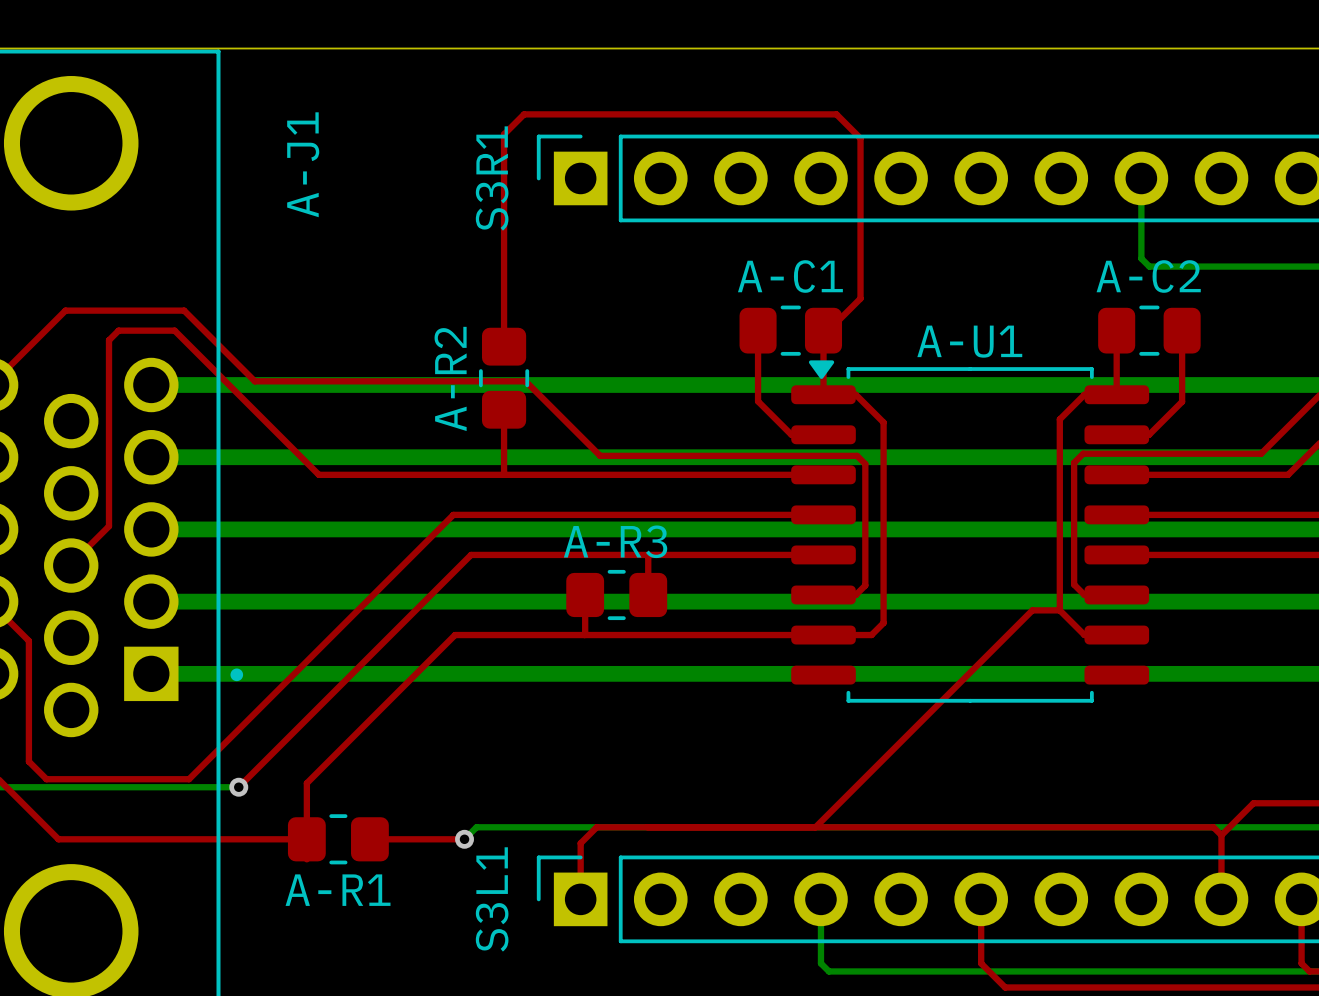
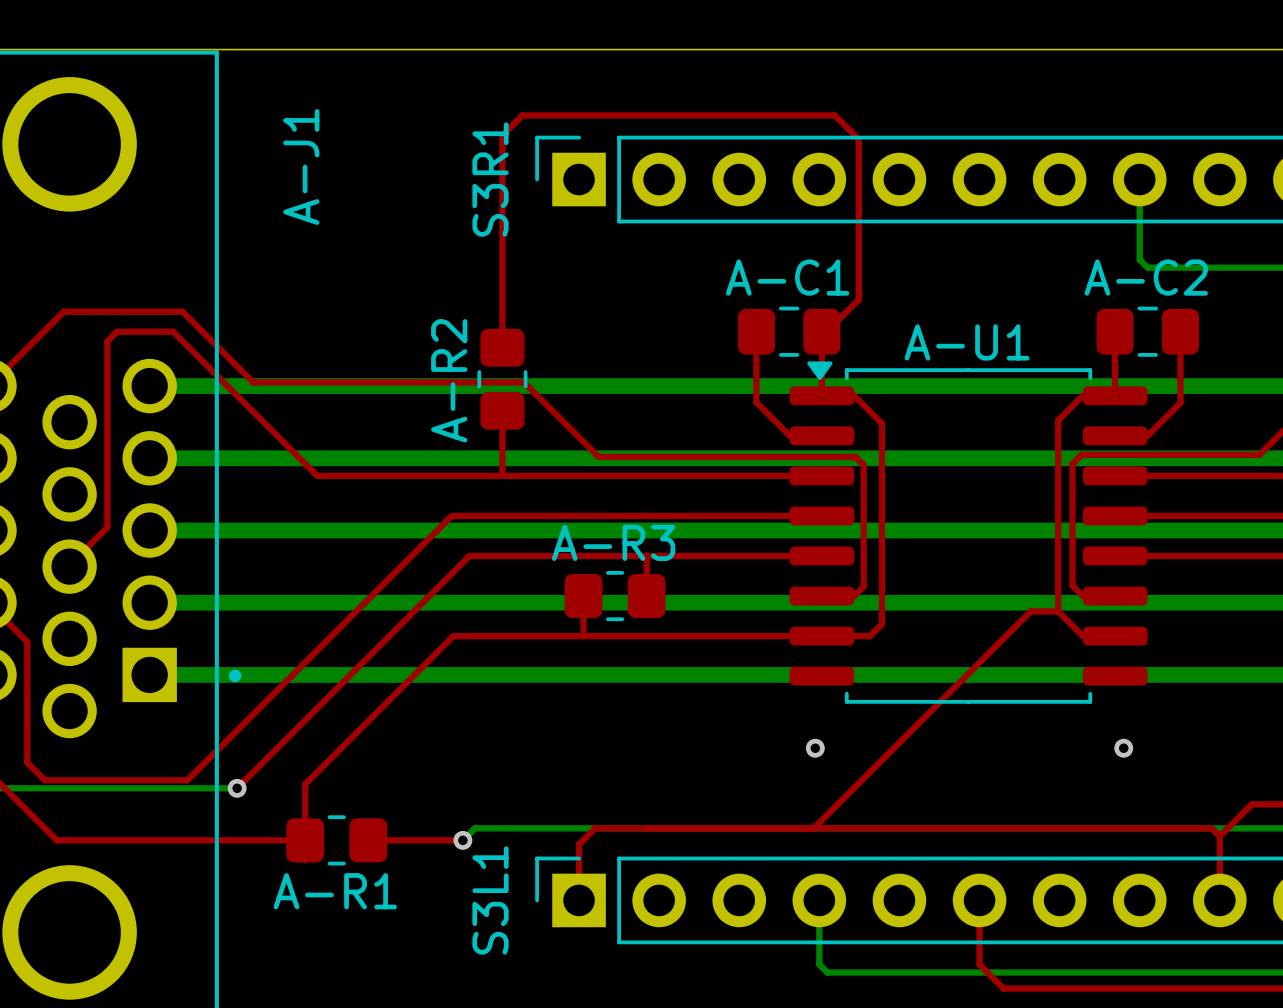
via: none -> (815, 748)
via: none -> (1123, 748)

